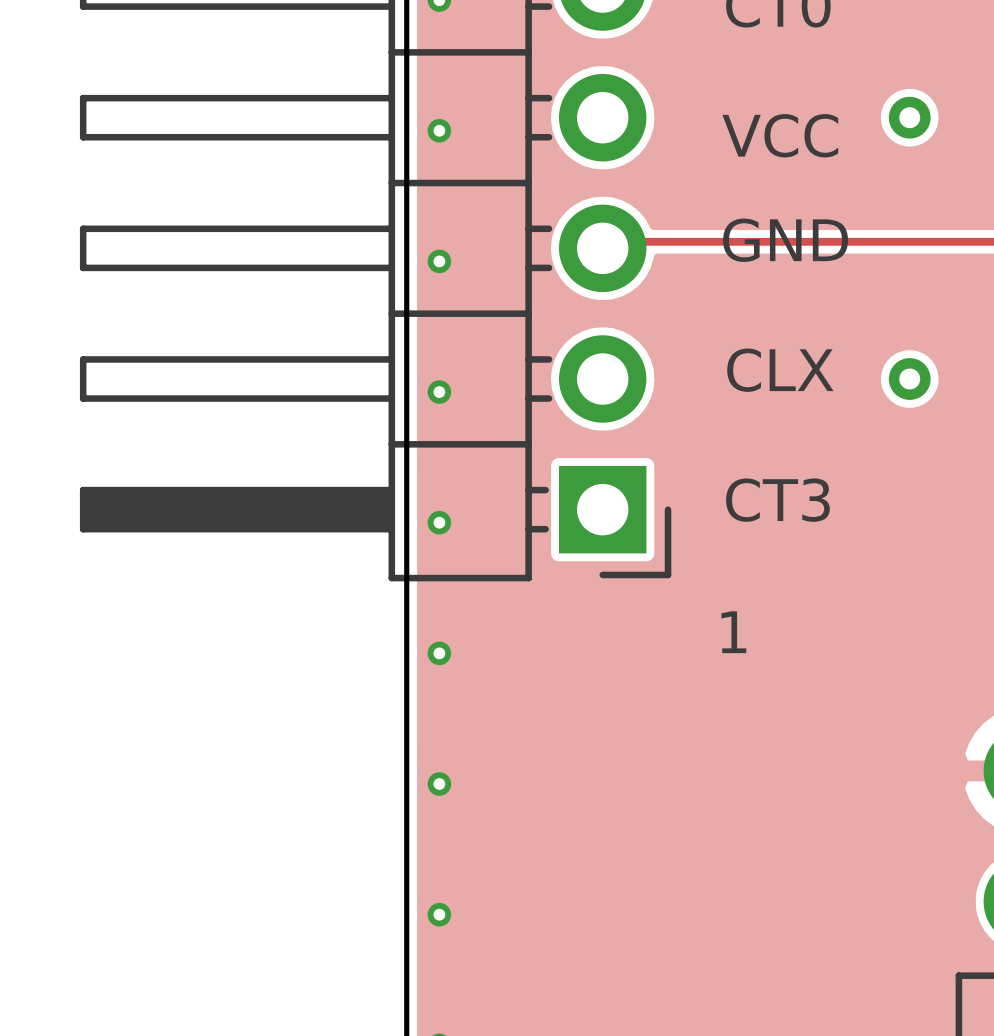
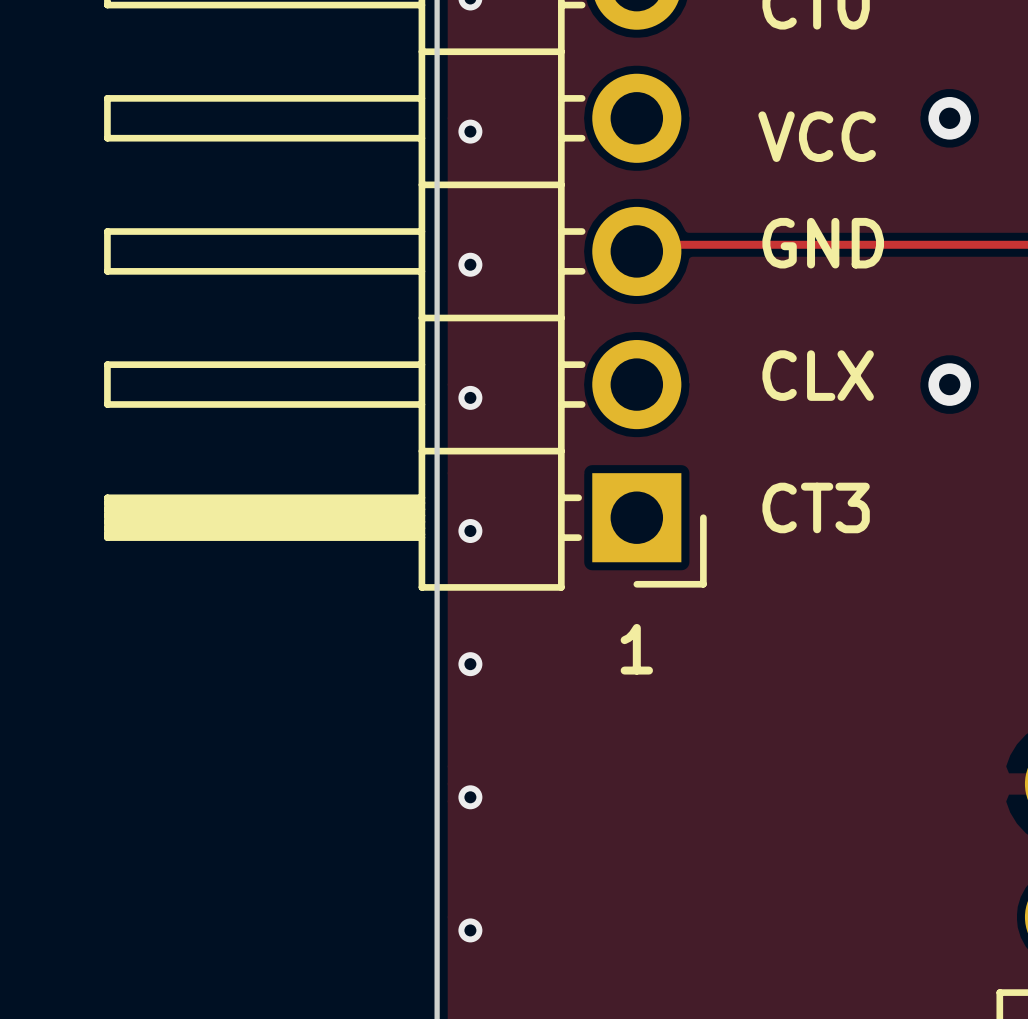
text position: 1 (733, 632) -> 1 (636, 649)

